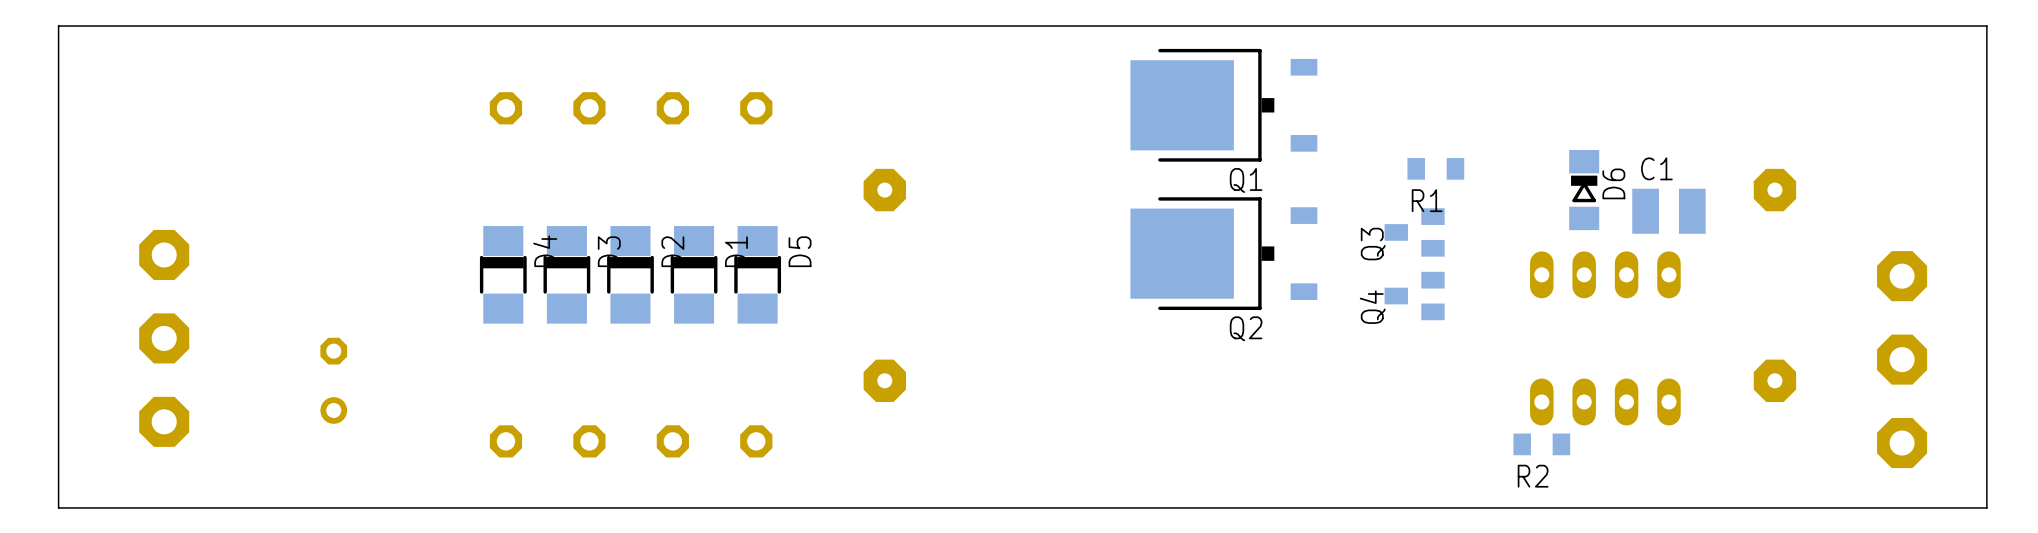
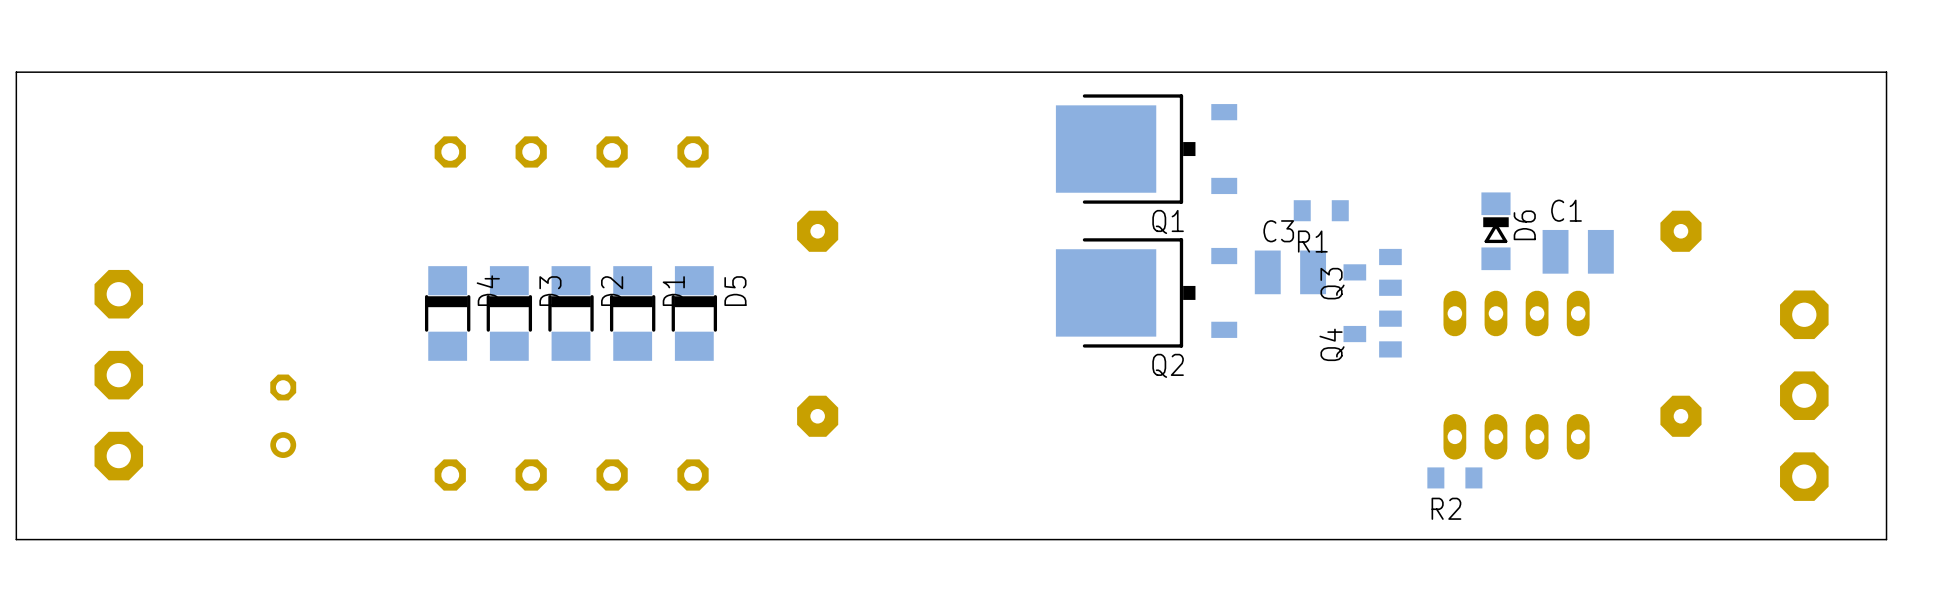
R1 position: (1435, 168) -> (1321, 210)
C3: none -> (1290, 272)
Q3 position: (1414, 232) -> (1372, 272)
Q4 position: (1414, 296) -> (1372, 334)

